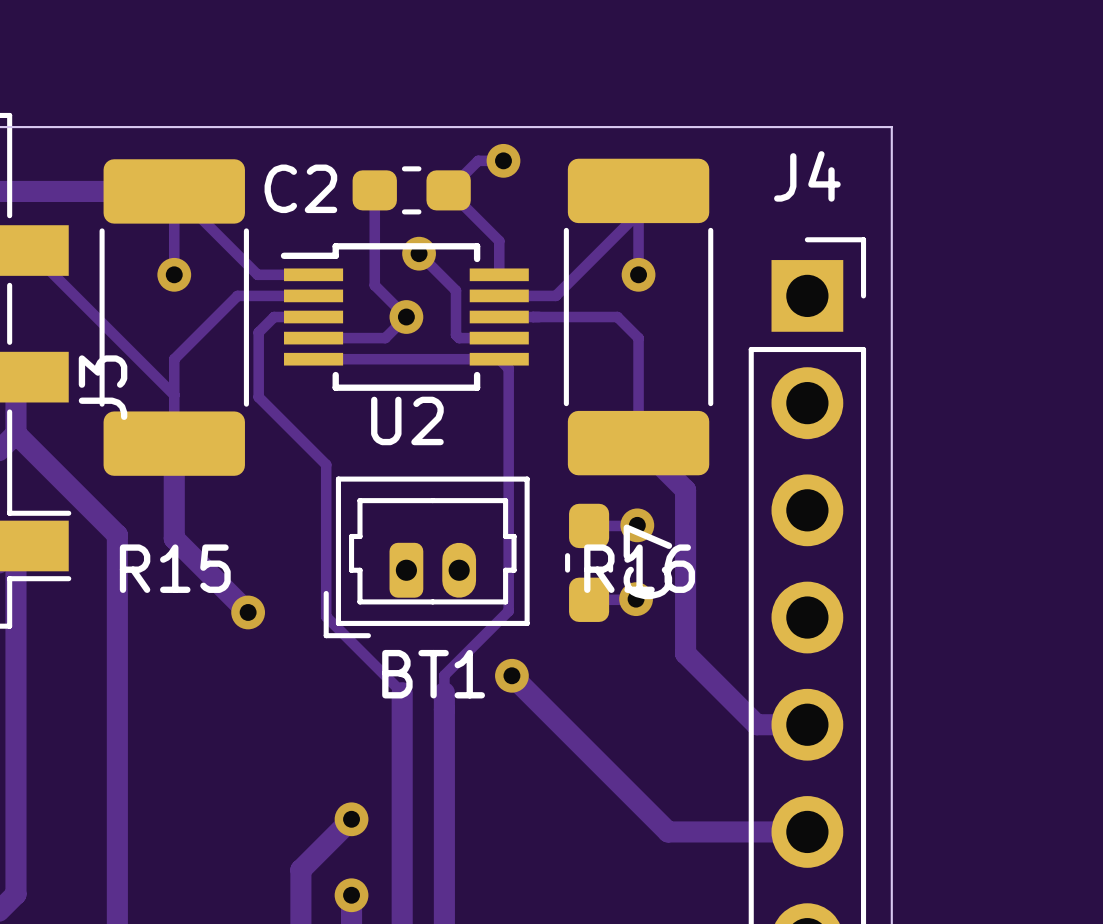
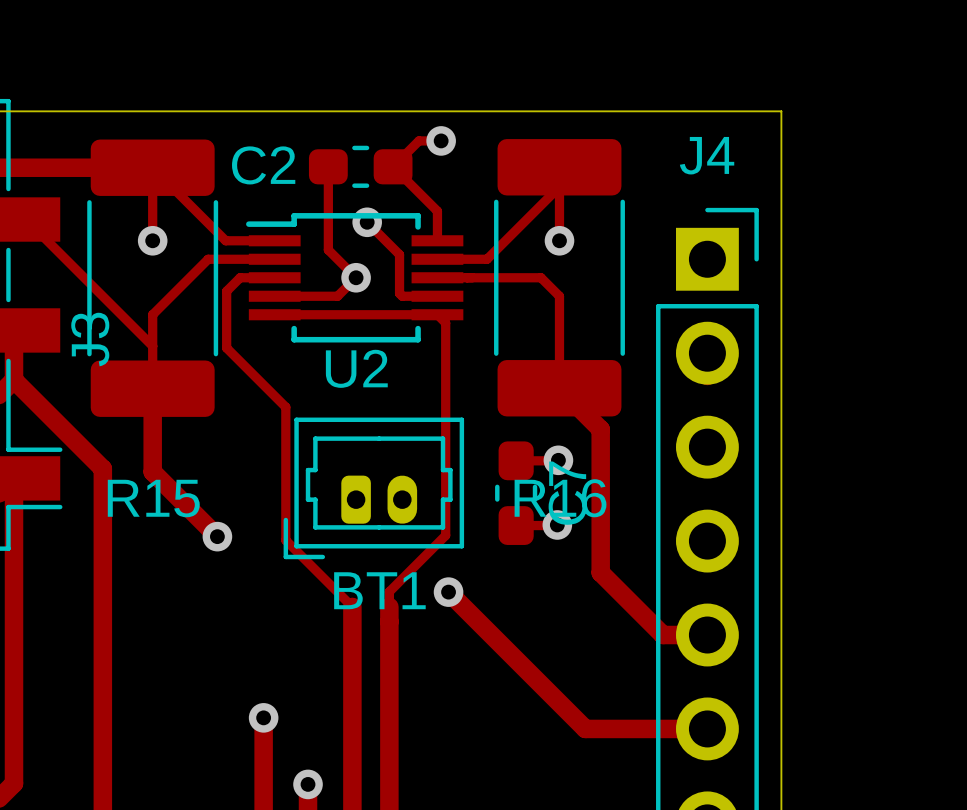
track: (351, 819) (300, 869) -> (263, 717) (263, 762)
via position: (351, 819) -> (263, 717)

